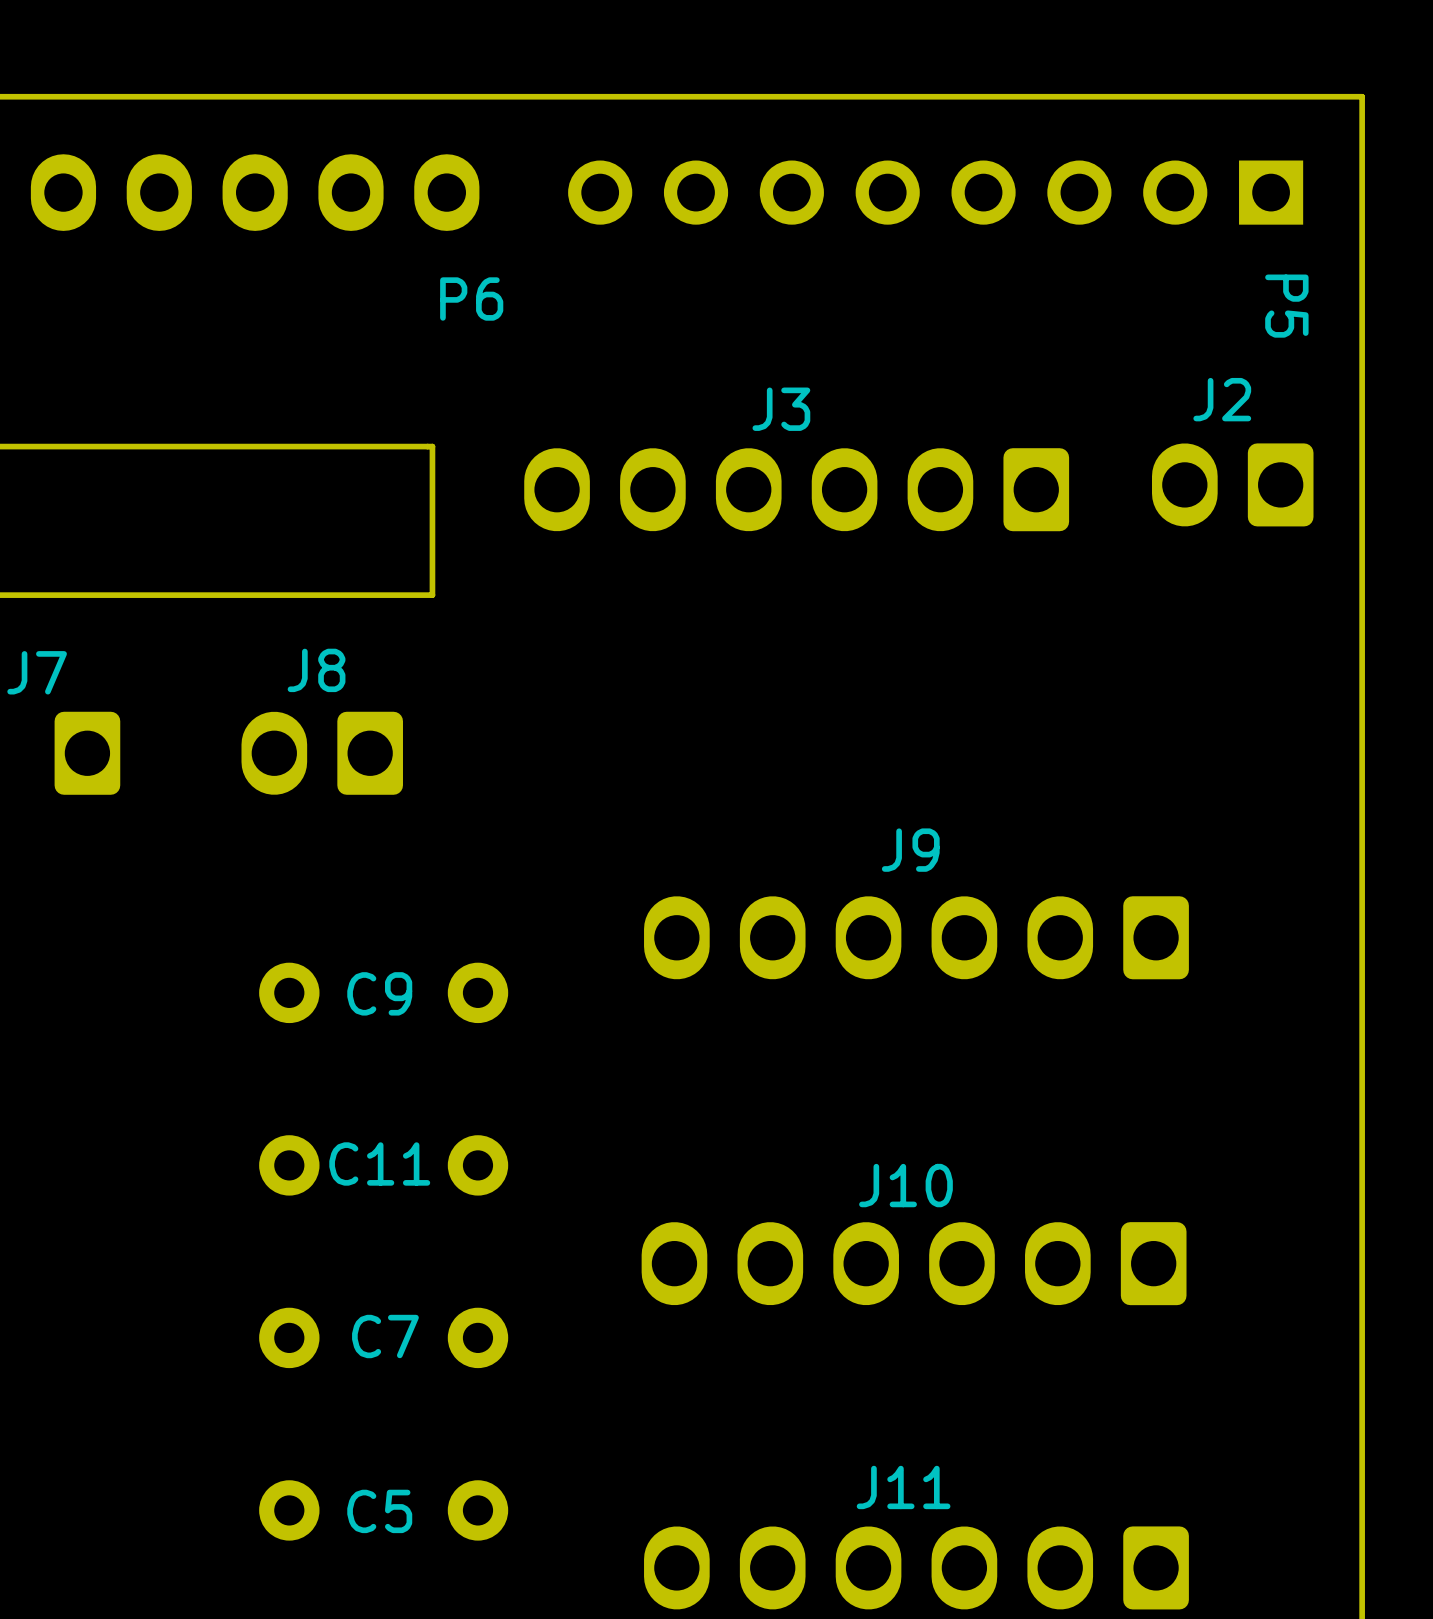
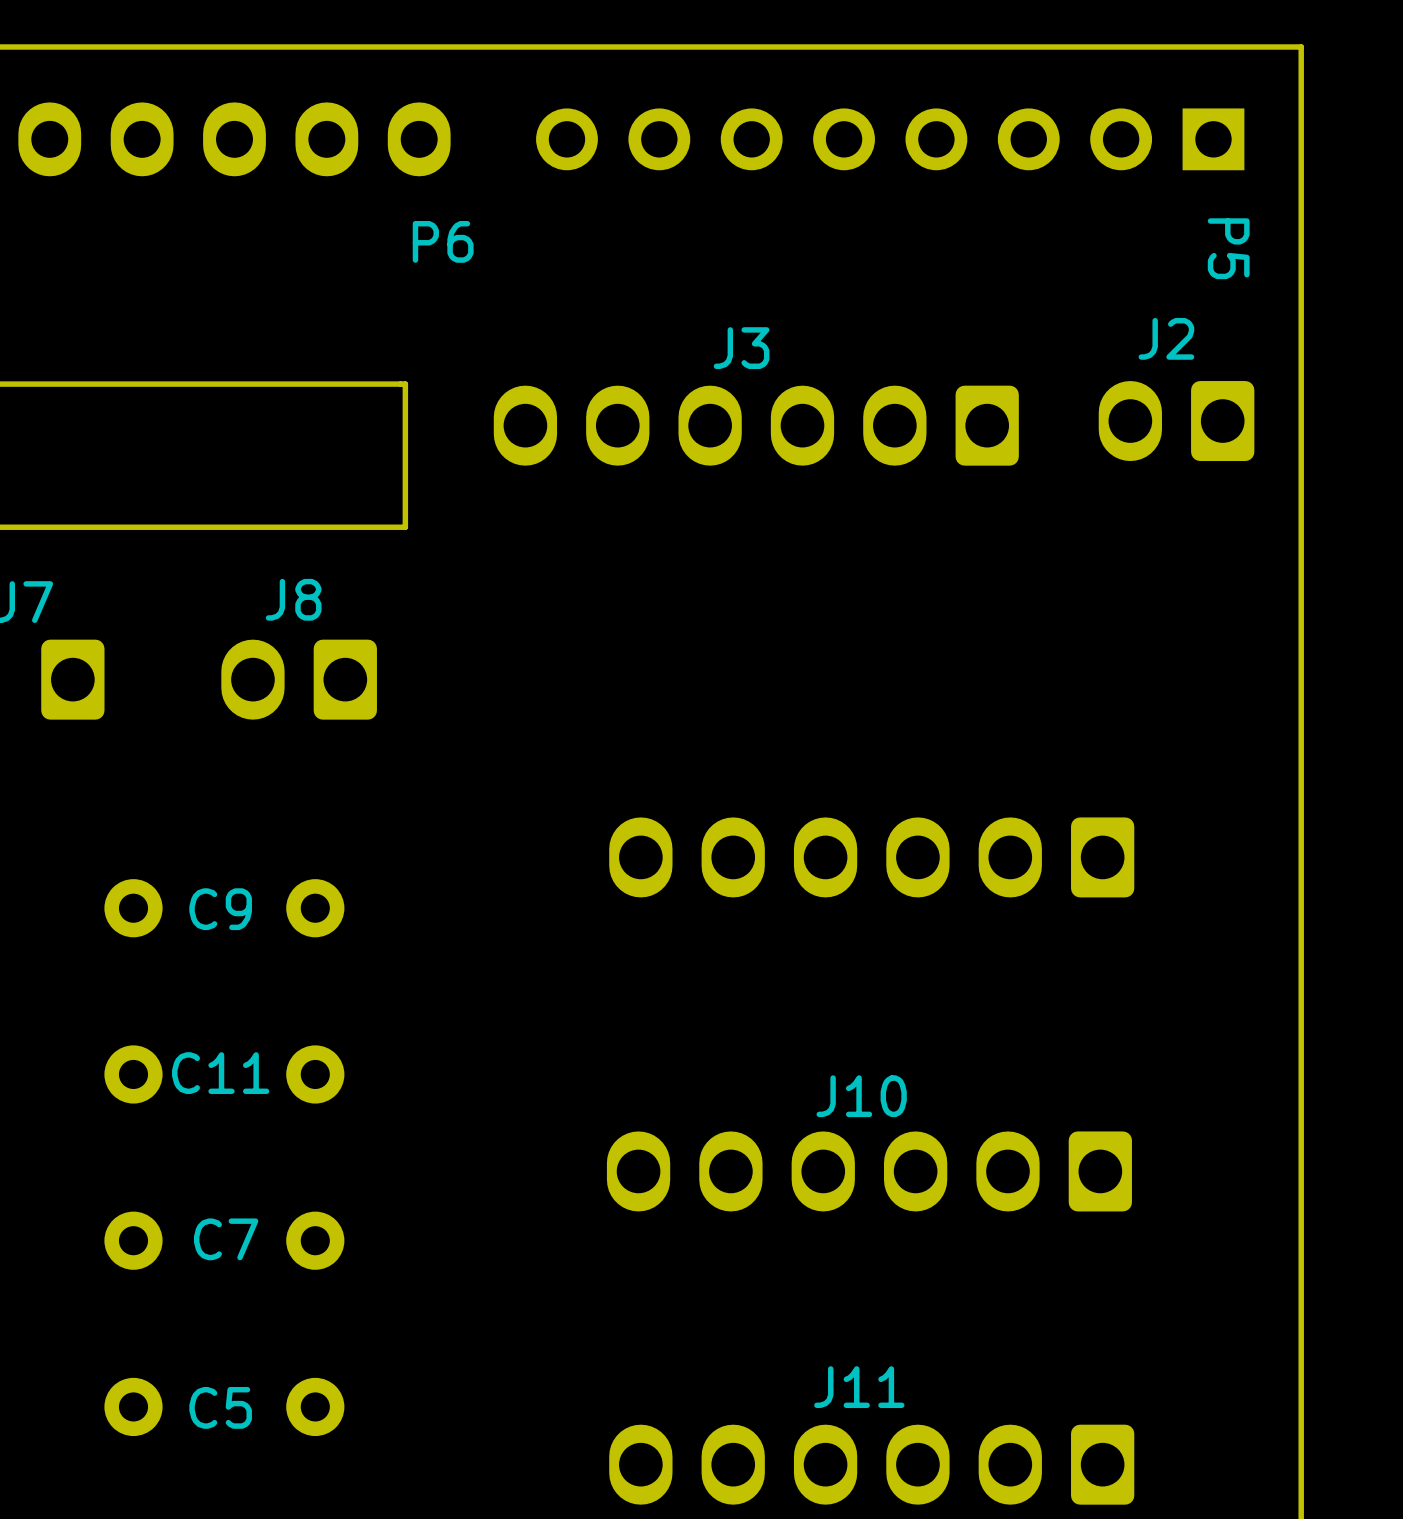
J9 name: J9 (910, 850) -> none
C9 position: (383, 992) -> (224, 908)
C11 position: (383, 1165) -> (224, 1074)
C7 position: (383, 1337) -> (224, 1240)
C5 position: (383, 1510) -> (224, 1406)

